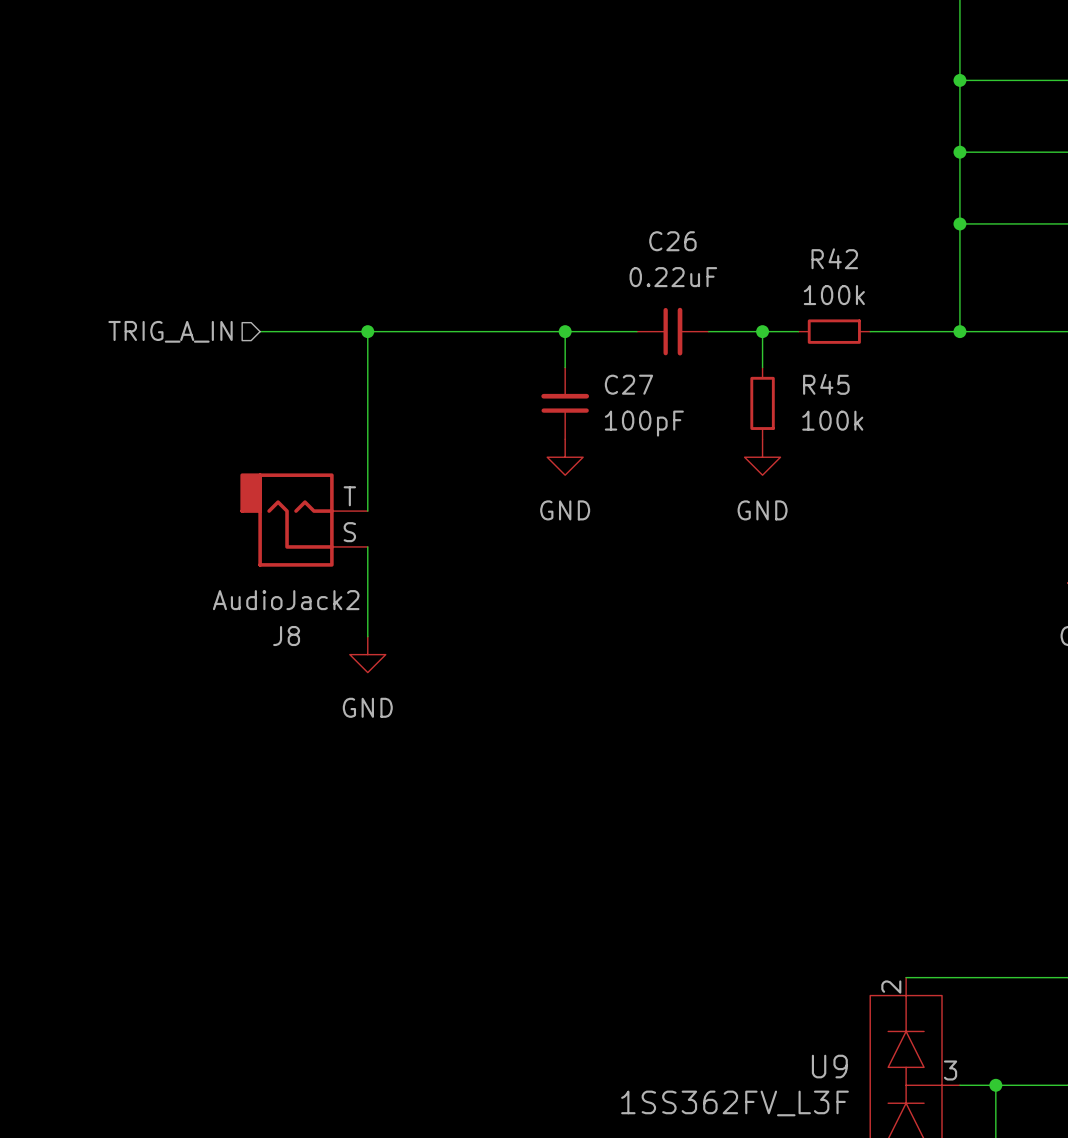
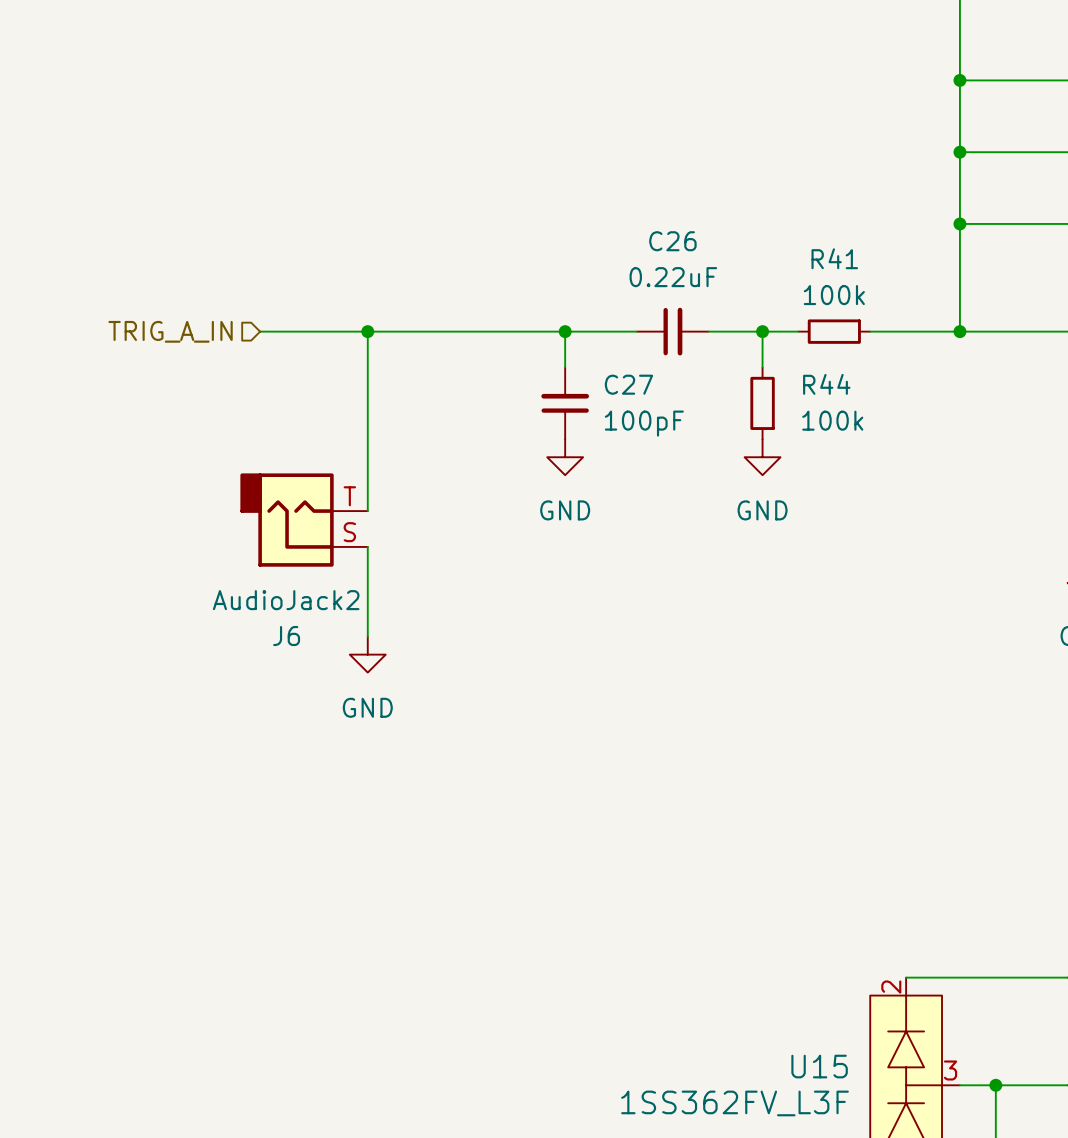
R42 name: R42 (834, 258) -> R41 (834, 258)
R45 name: R45 (826, 384) -> R44 (826, 384)
J8 name: J8 (286, 636) -> J6 (286, 636)
U9 name: U9 (829, 1066) -> U15 (819, 1066)

